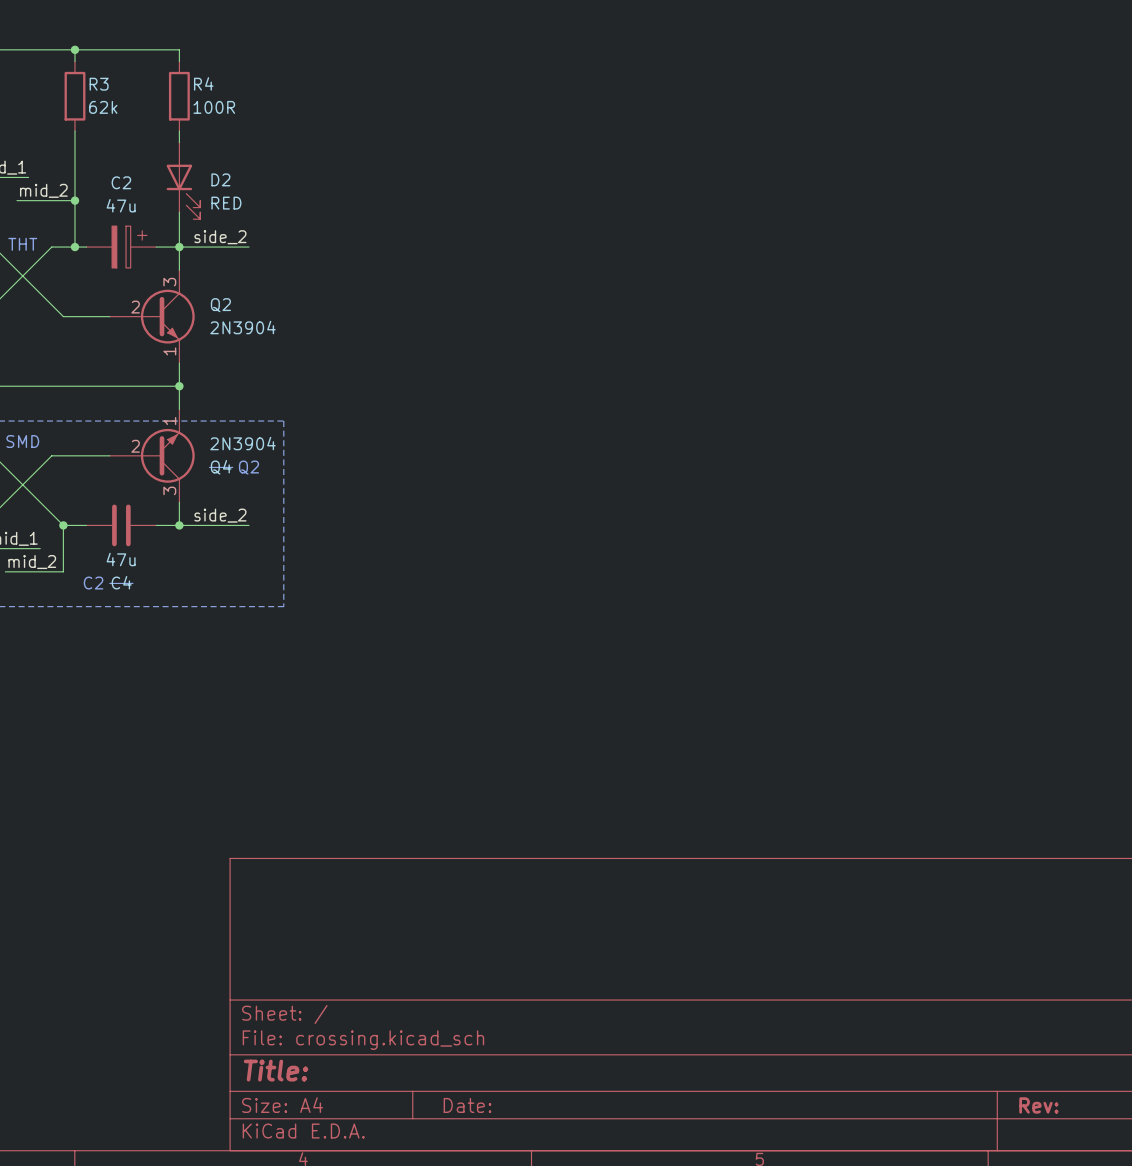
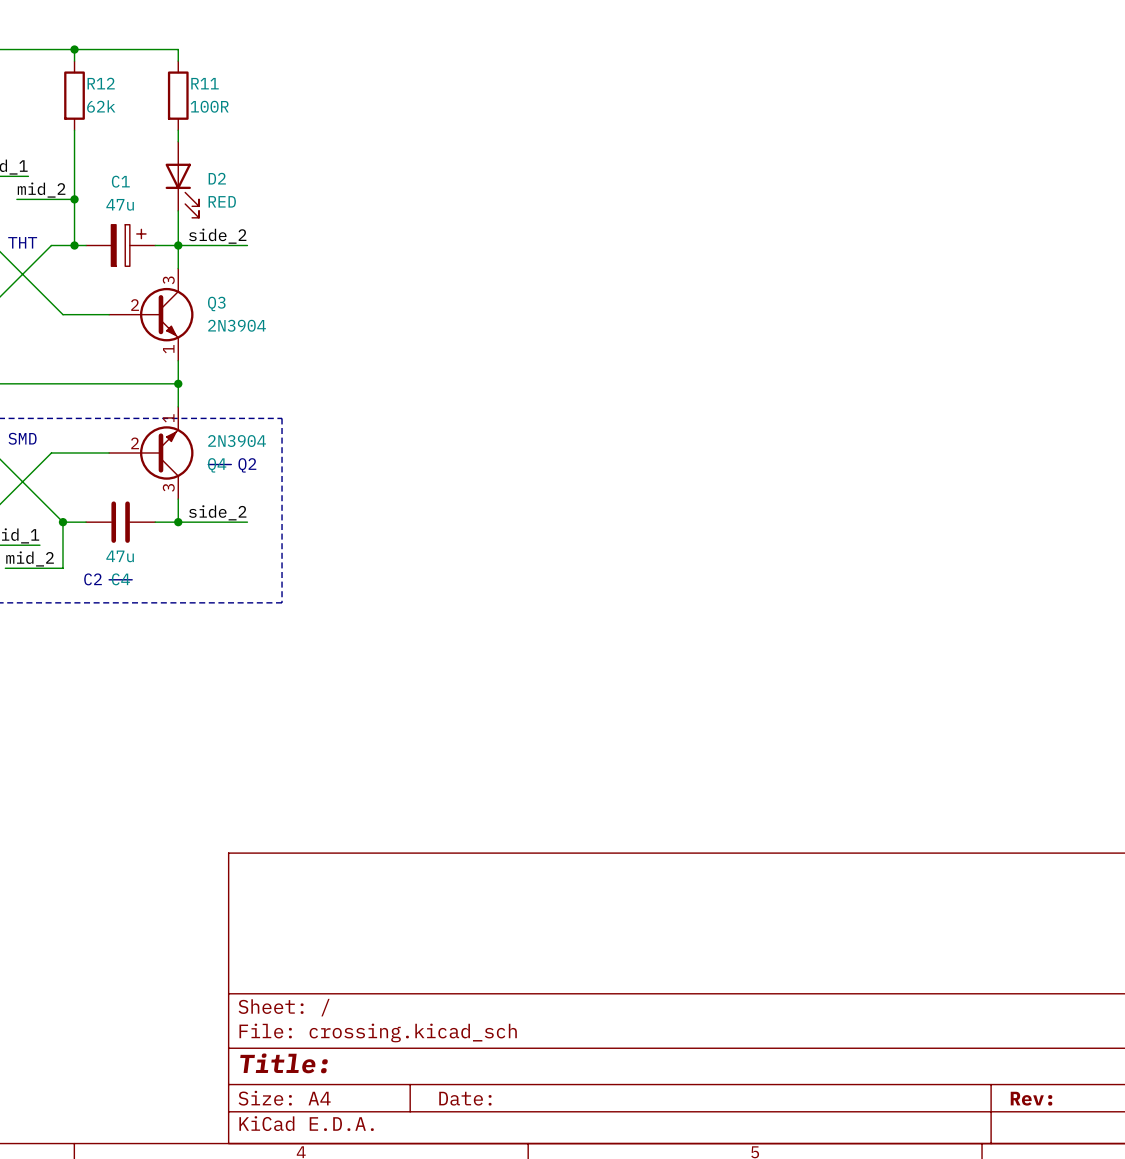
R4 name: R4 (203, 83) -> R11 (205, 83)
R3 name: R3 (99, 84) -> R12 (101, 83)
C2 name: C2 (121, 182) -> C1 (120, 181)
Q2 name: Q2 (220, 305) -> Q3 (216, 303)

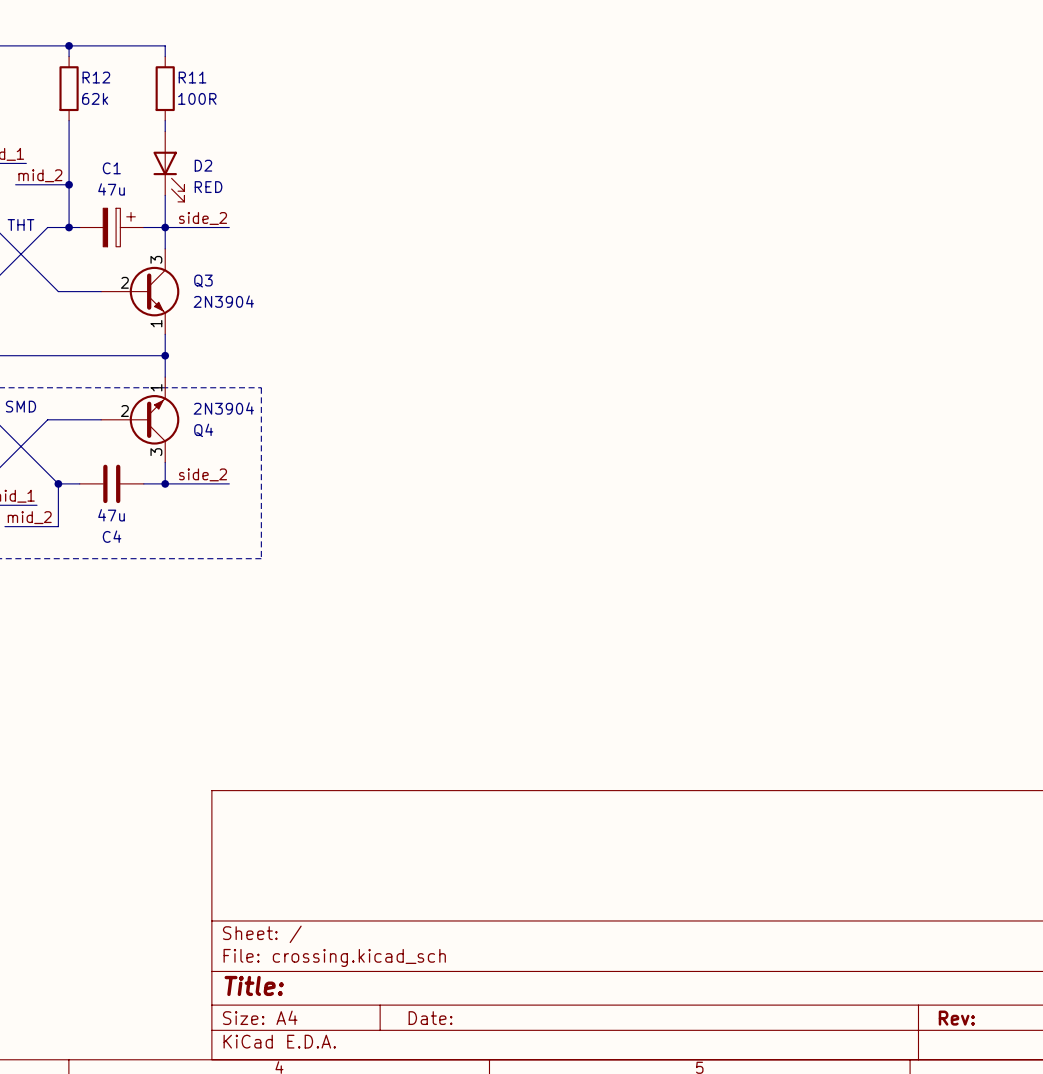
line: (208, 464) (231, 464) -> none
text: Q2 (247, 465) -> none
text: C2 (93, 579) -> none
line: (109, 579) (132, 579) -> none

